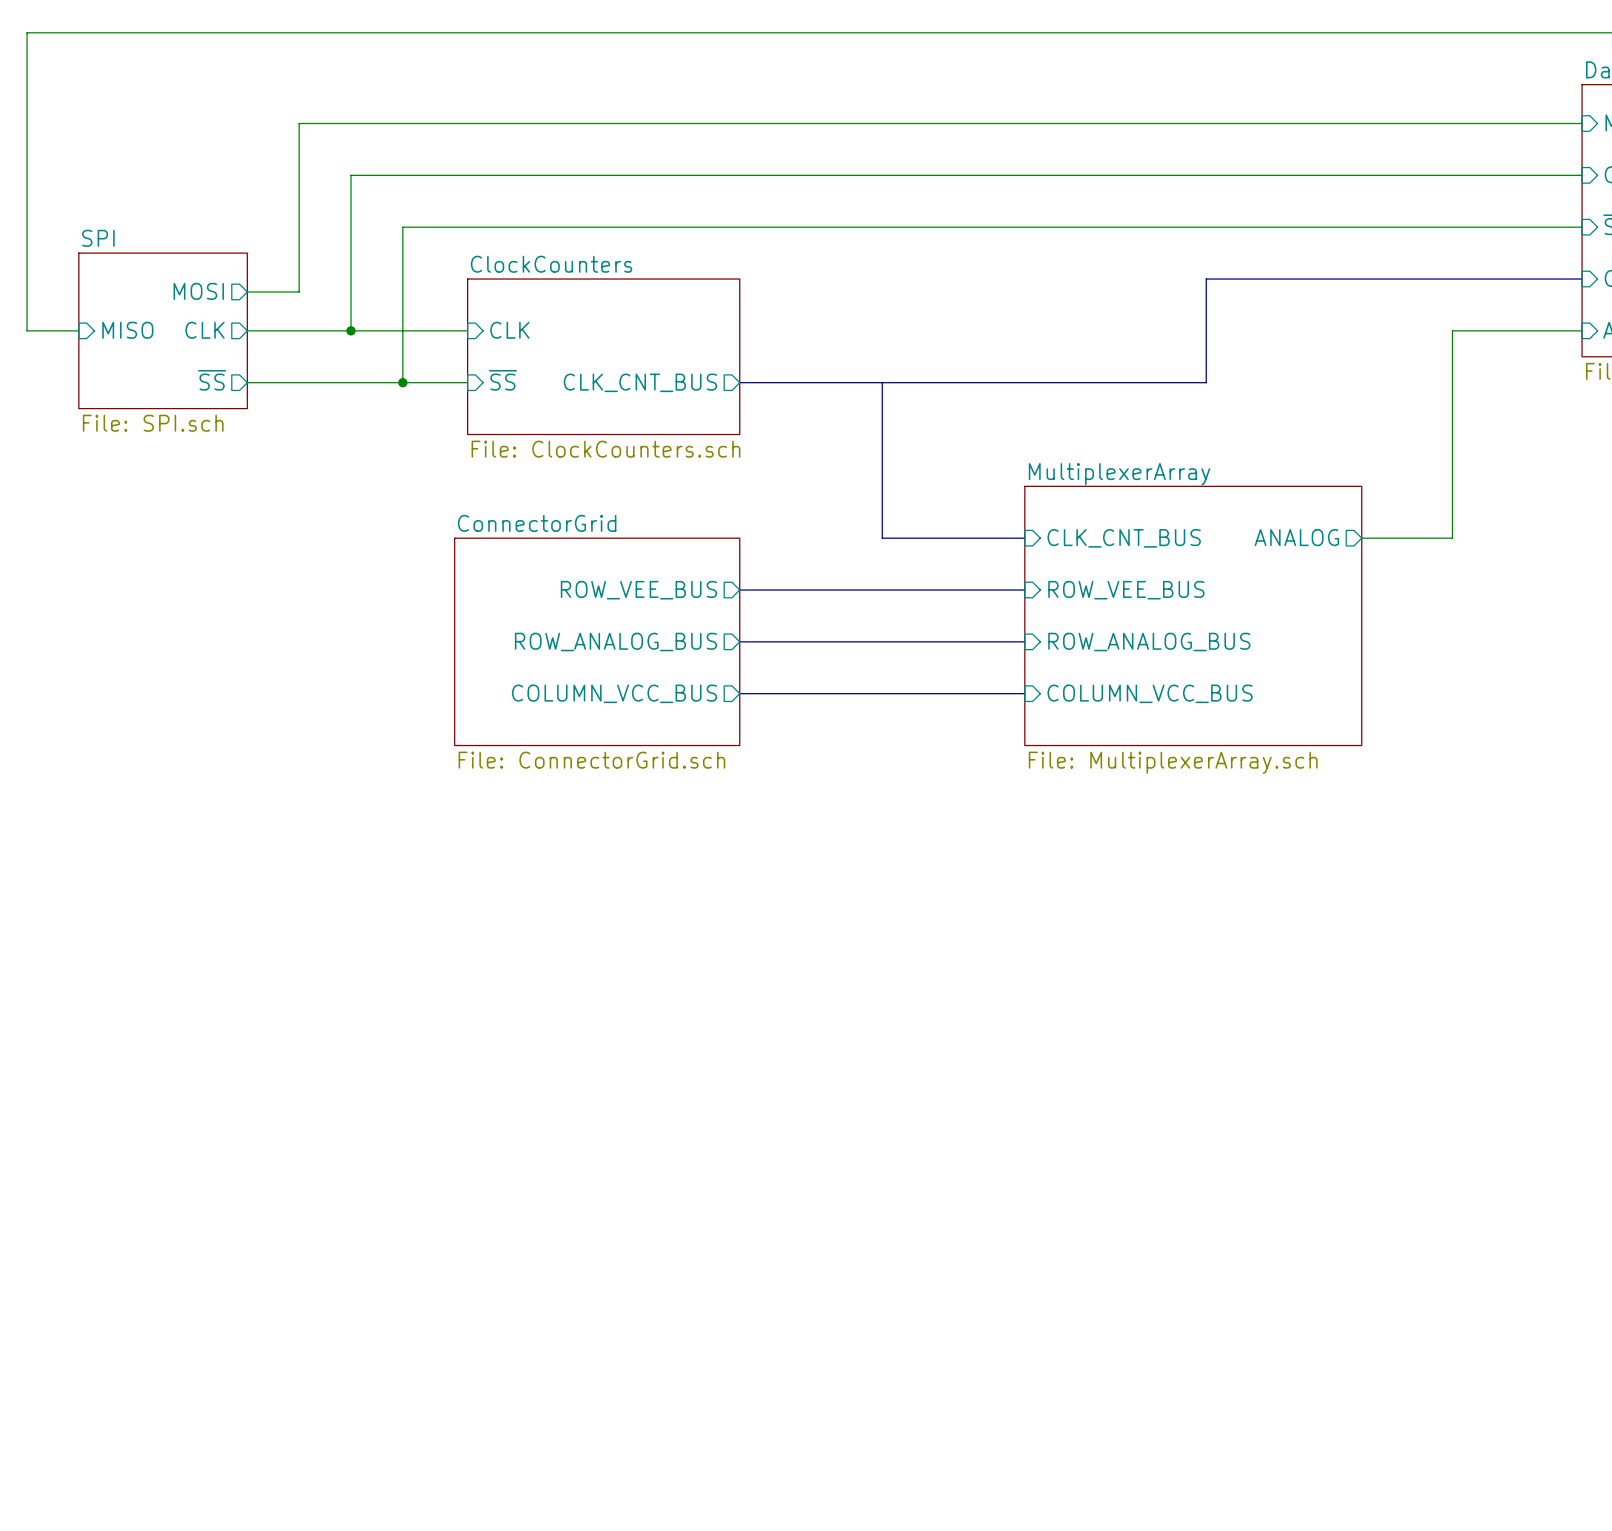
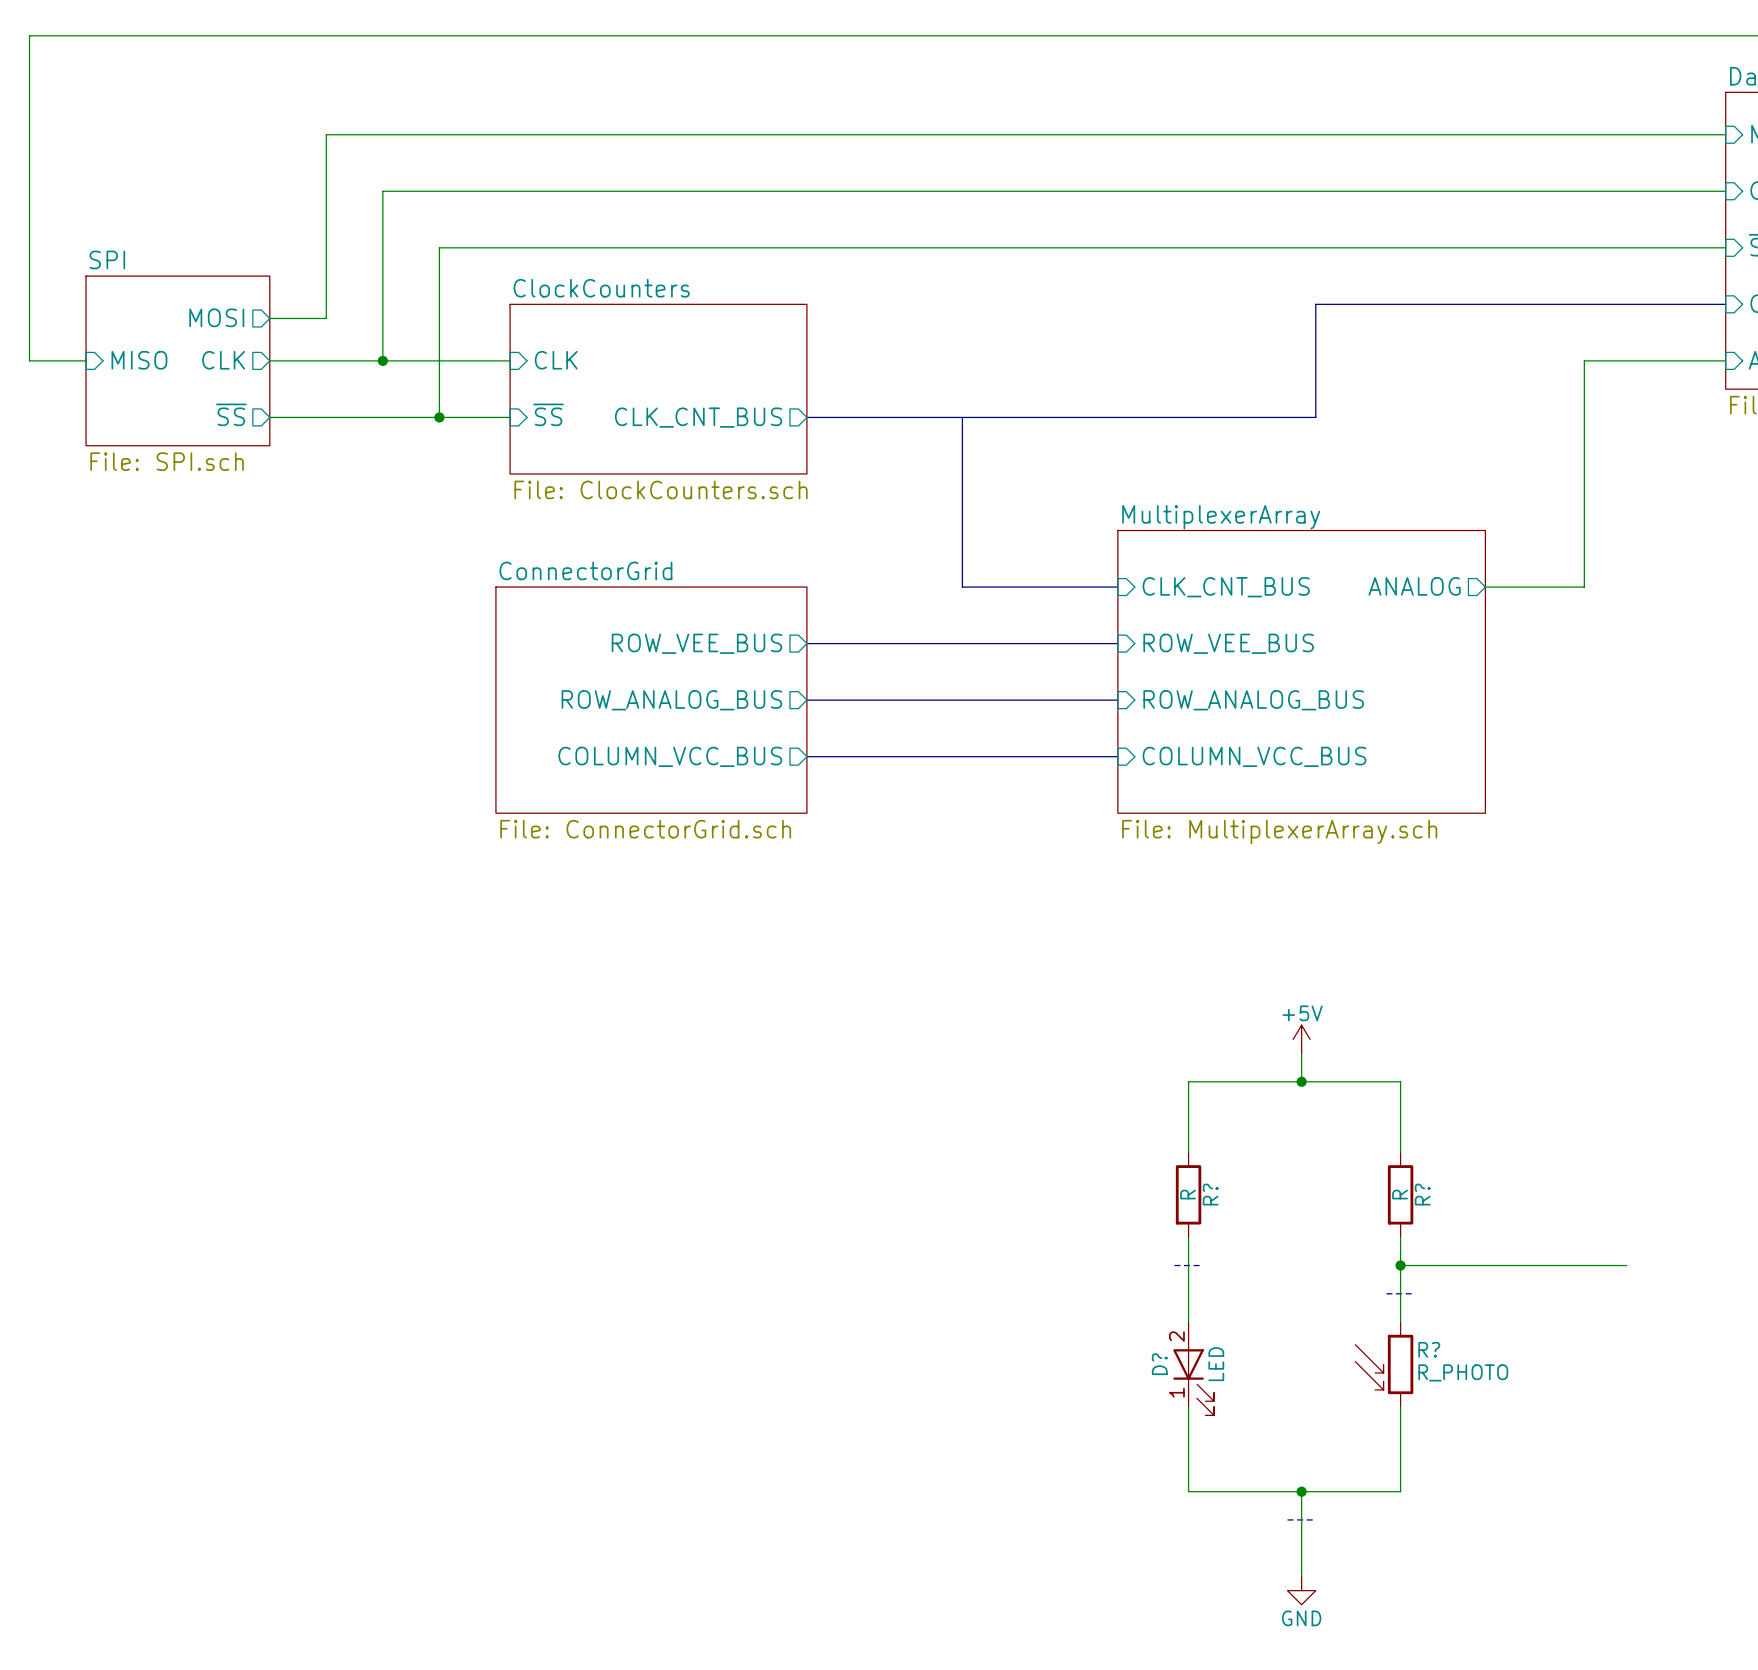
power symbol: none -> +5V (1301, 1039)
wire: none -> (1301, 1053) (1301, 1081)
junction: none -> (1301, 1081)
wire: none -> (1188, 1152) (1188, 1081) (1400, 1081) (1400, 1152)
R?: none -> R (1188, 1194)
R?: none -> R (1400, 1194)
wire: none -> (1188, 1237) (1188, 1322)
wire: none -> (1400, 1237) (1400, 1322)
line: none -> (1174, 1265) (1202, 1265)
wire: none -> (1400, 1265) (1626, 1265)
junction: none -> (1400, 1265)
line: none -> (1386, 1293) (1414, 1293)
R?: none -> R_PHOTO (1384, 1364)
D?: none -> LED (1193, 1368)
wire: none -> (1188, 1406) (1188, 1491) (1400, 1491) (1400, 1406)
wire: none -> (1301, 1491) (1301, 1576)
junction: none -> (1301, 1491)
line: none -> (1287, 1519) (1315, 1519)
power symbol: none -> GND (1301, 1590)

